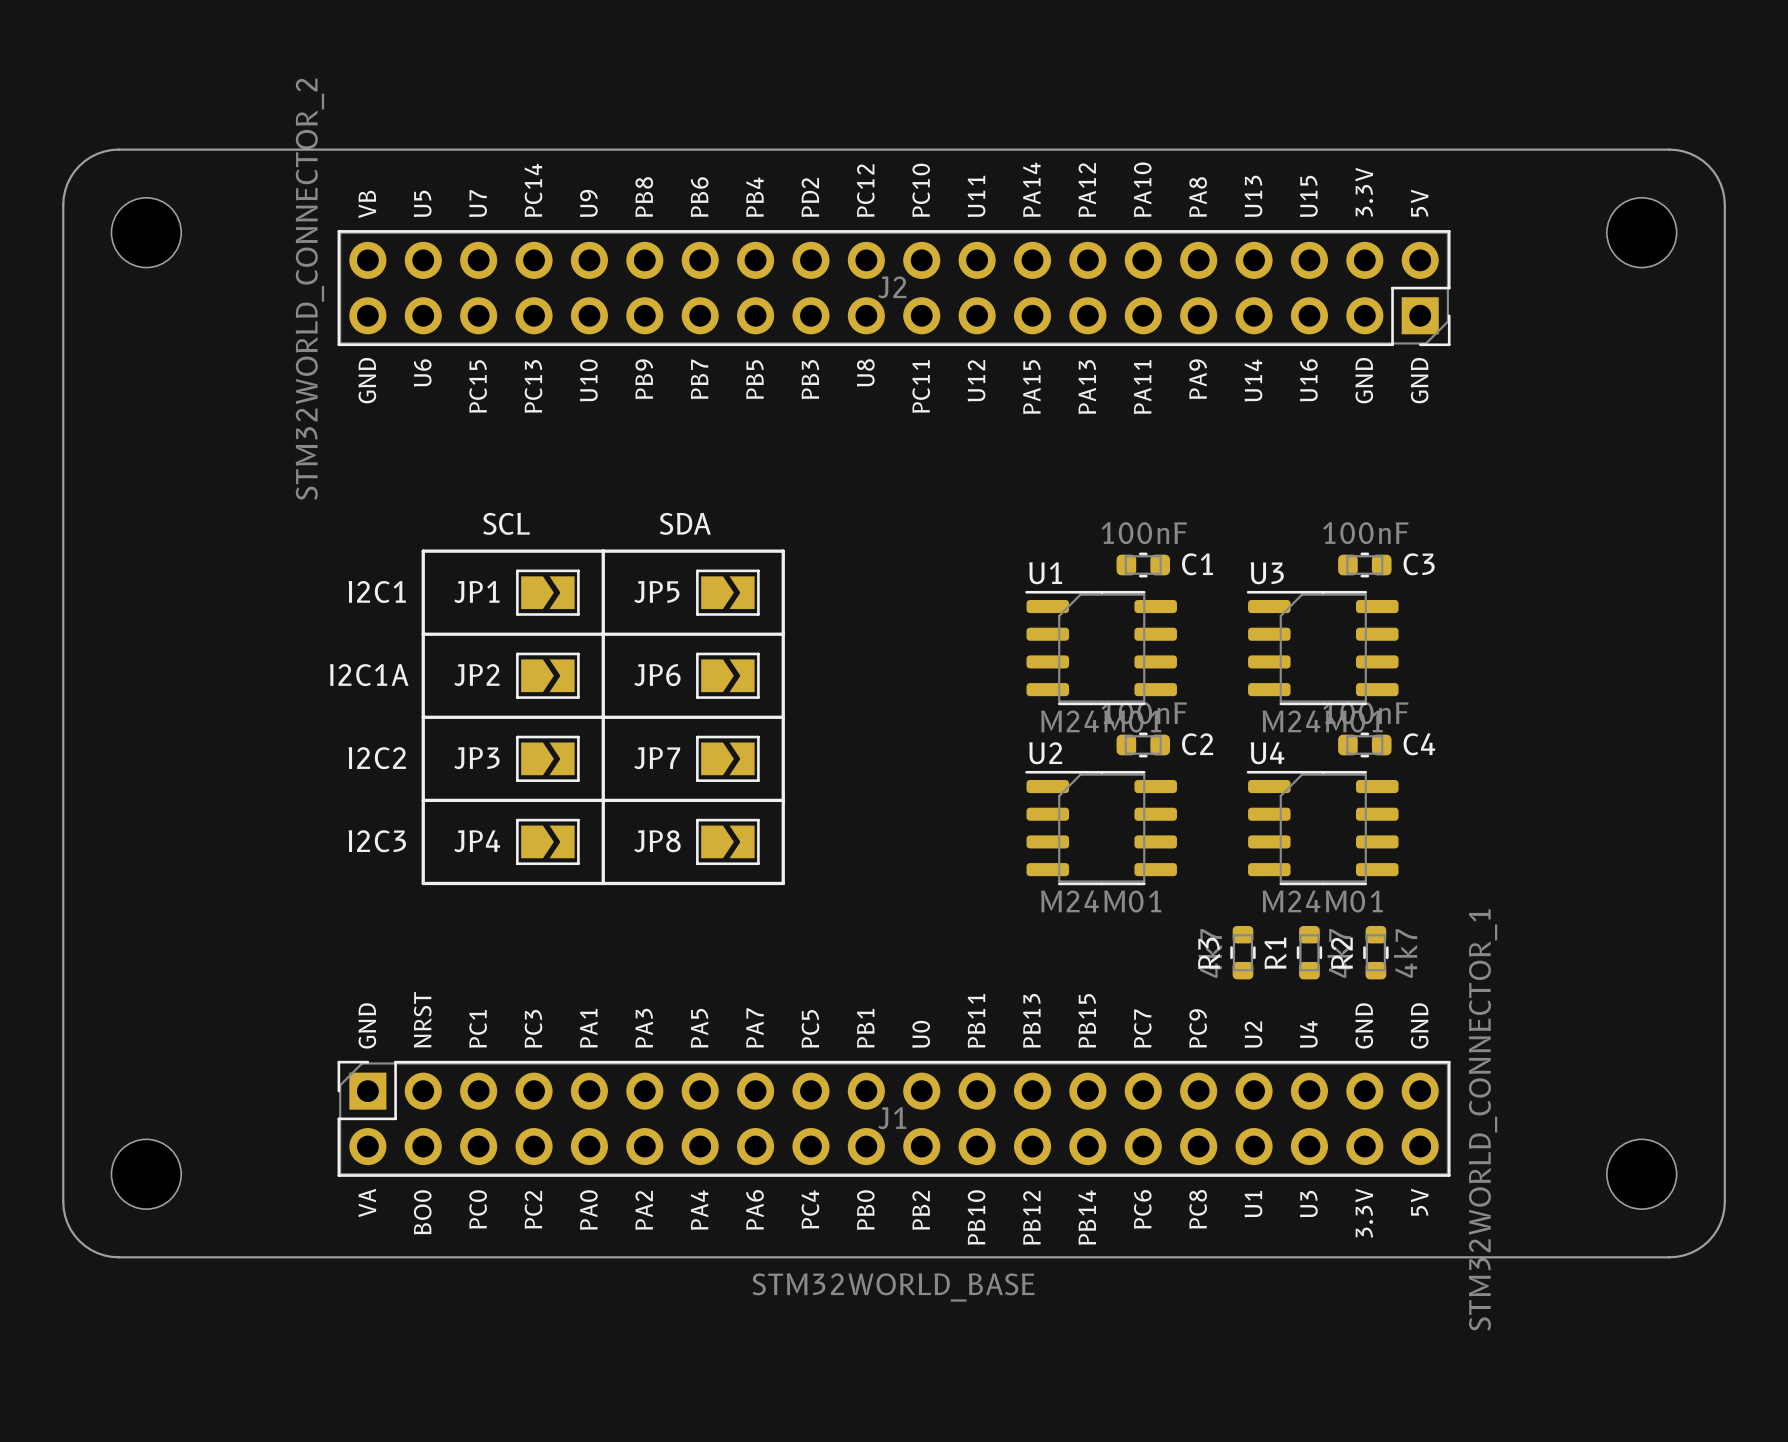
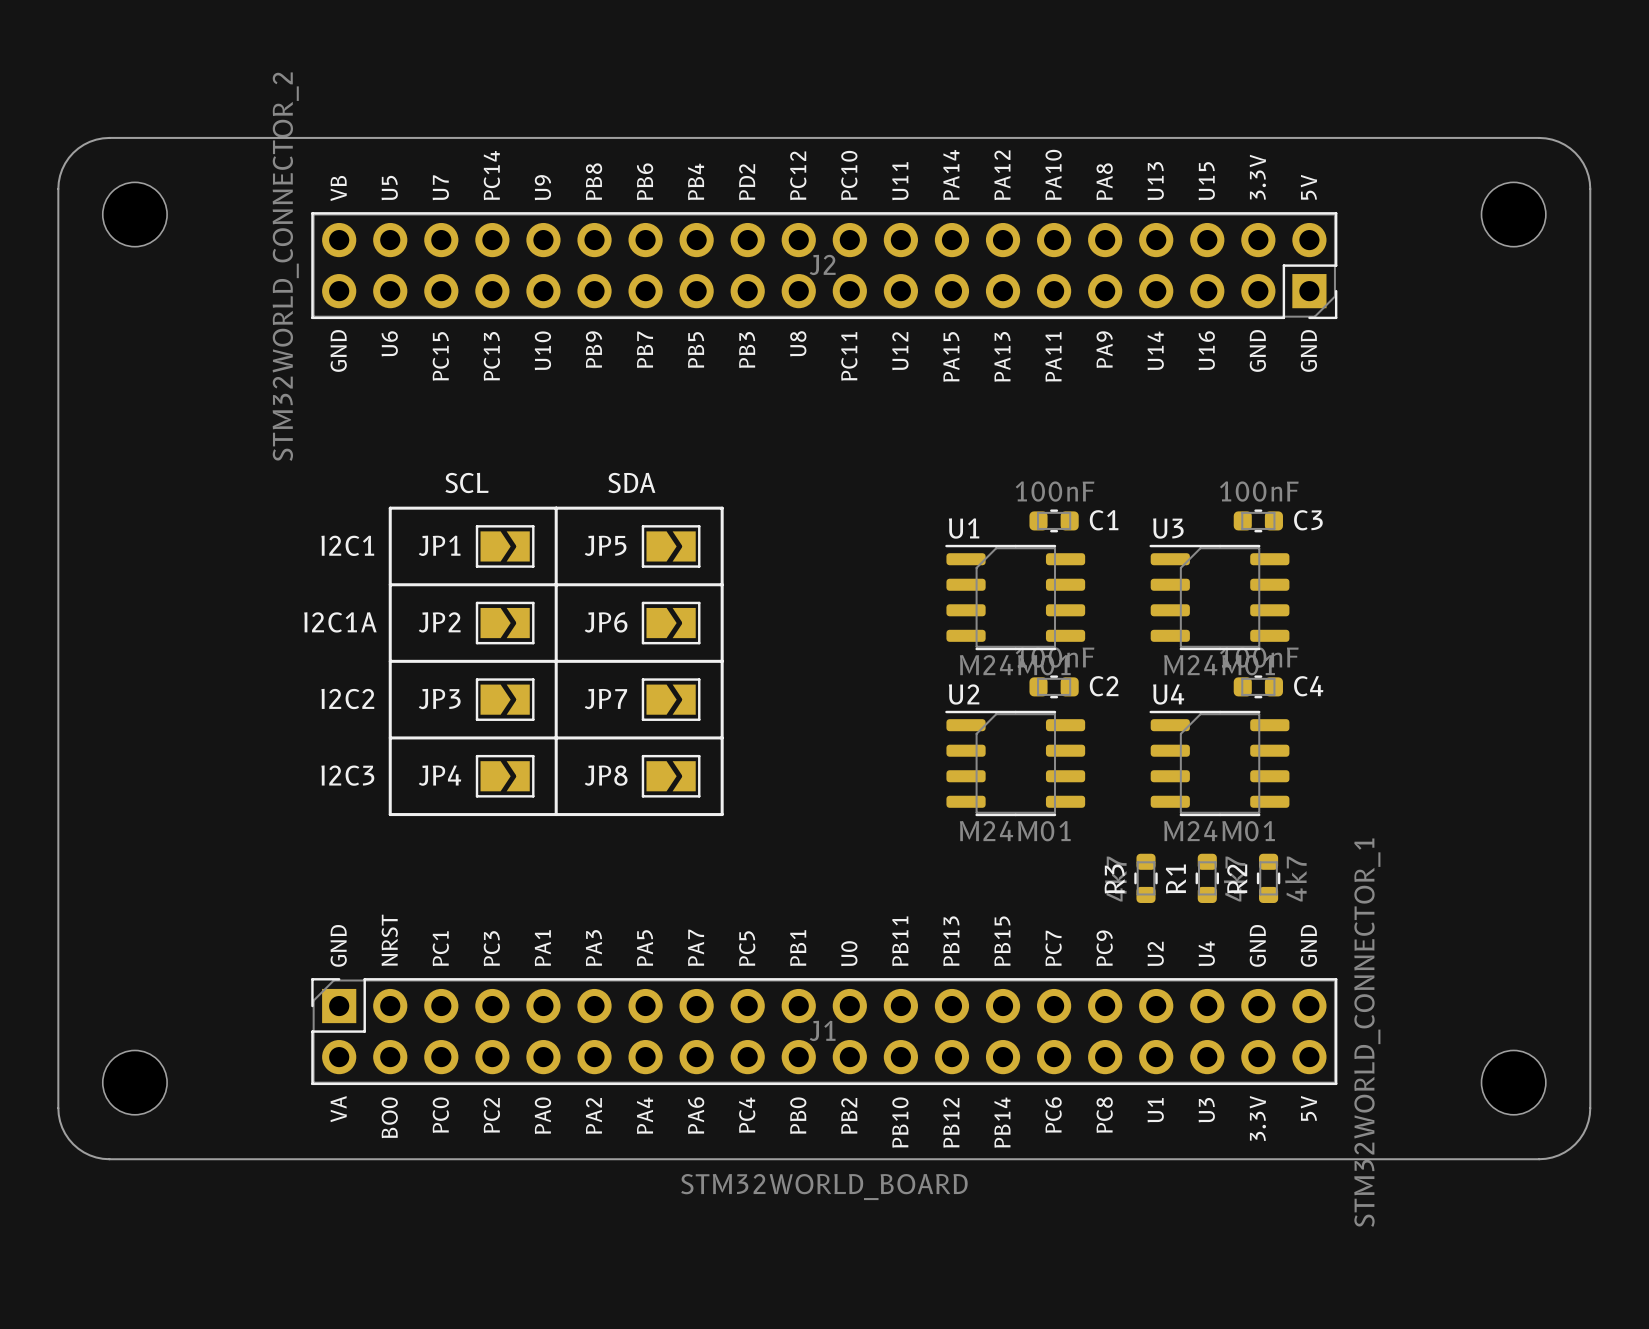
part value: STM32WORLD_BASE (893, 1287) -> STM32WORLD_BOARD (824, 1187)

